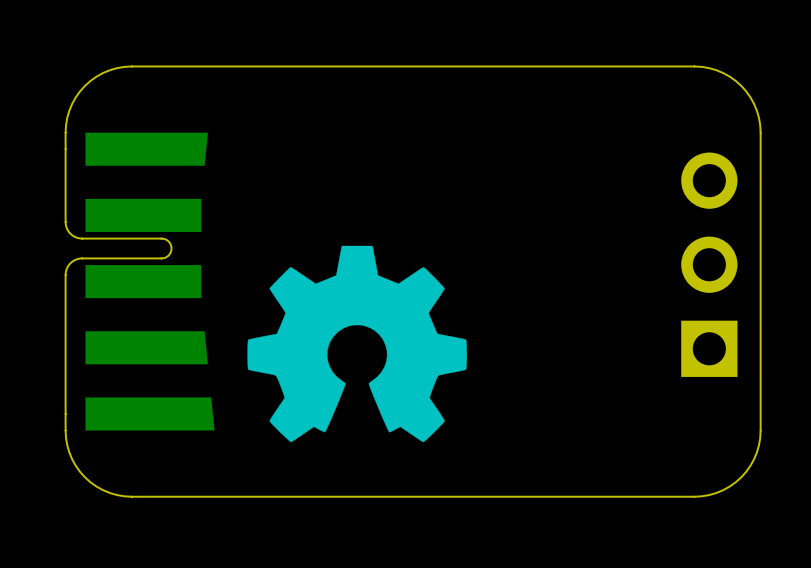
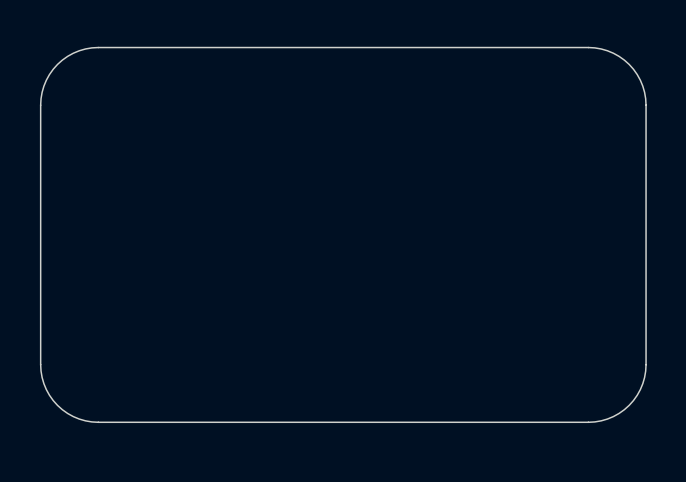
board edge: none -> (40, 119) (40, 350)
drawing: [247, 245, 467, 443] -> none
part: (709, 264) -> none
part: (139, 281) -> none

